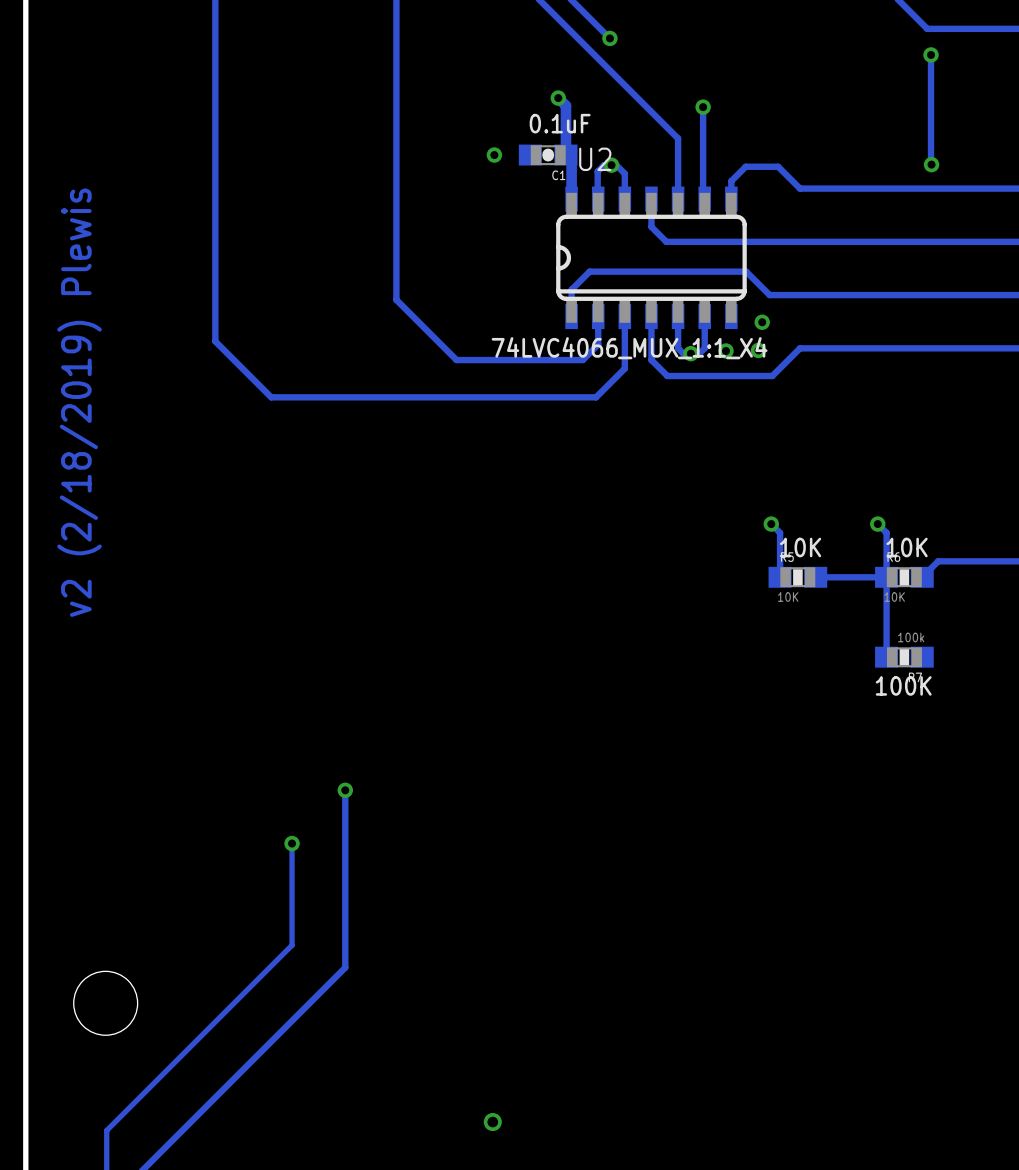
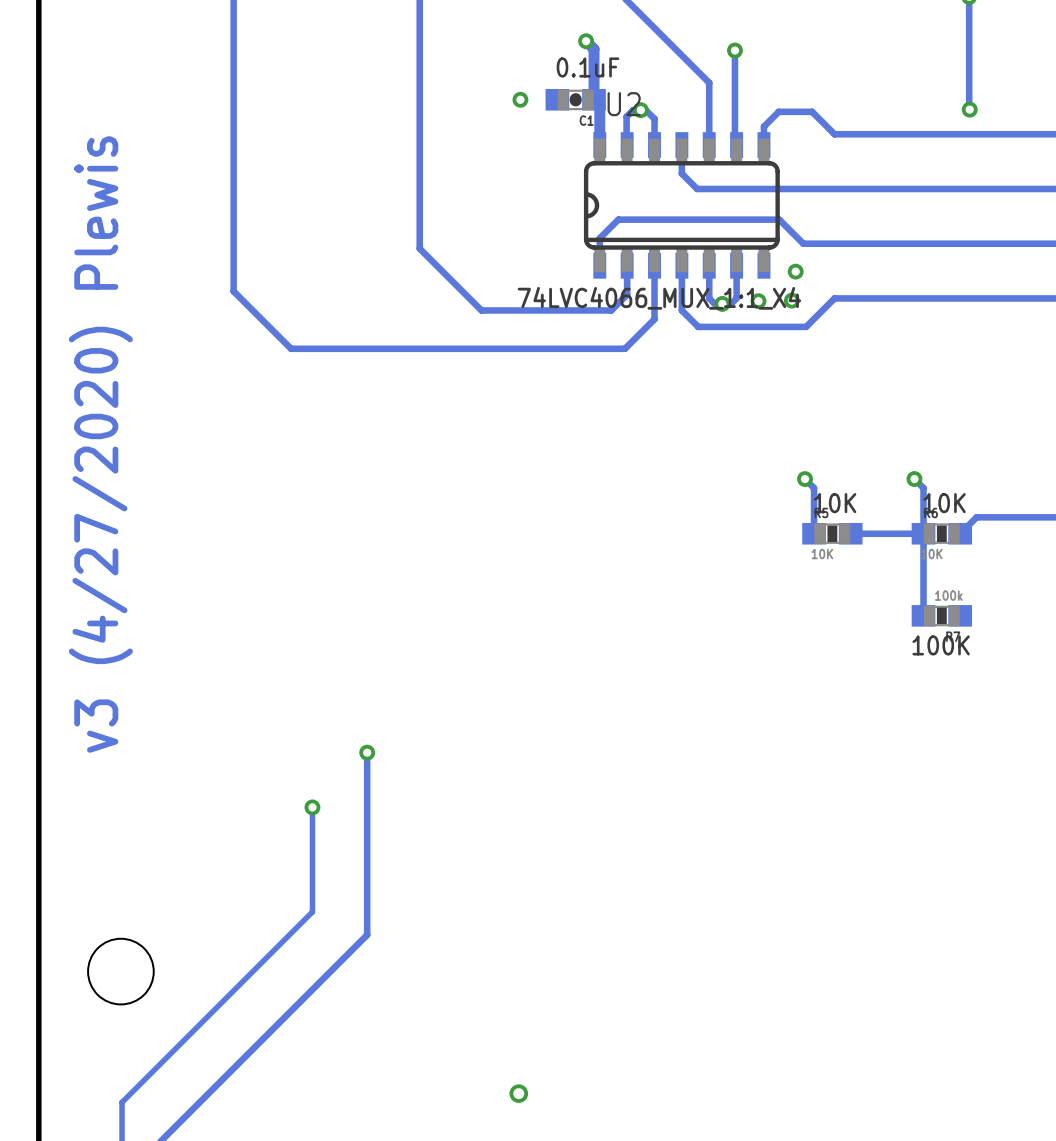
text: v2 (2/18/2019) Plewis (79, 402) -> v3 (4/27/2020) Plewis (100, 444)

